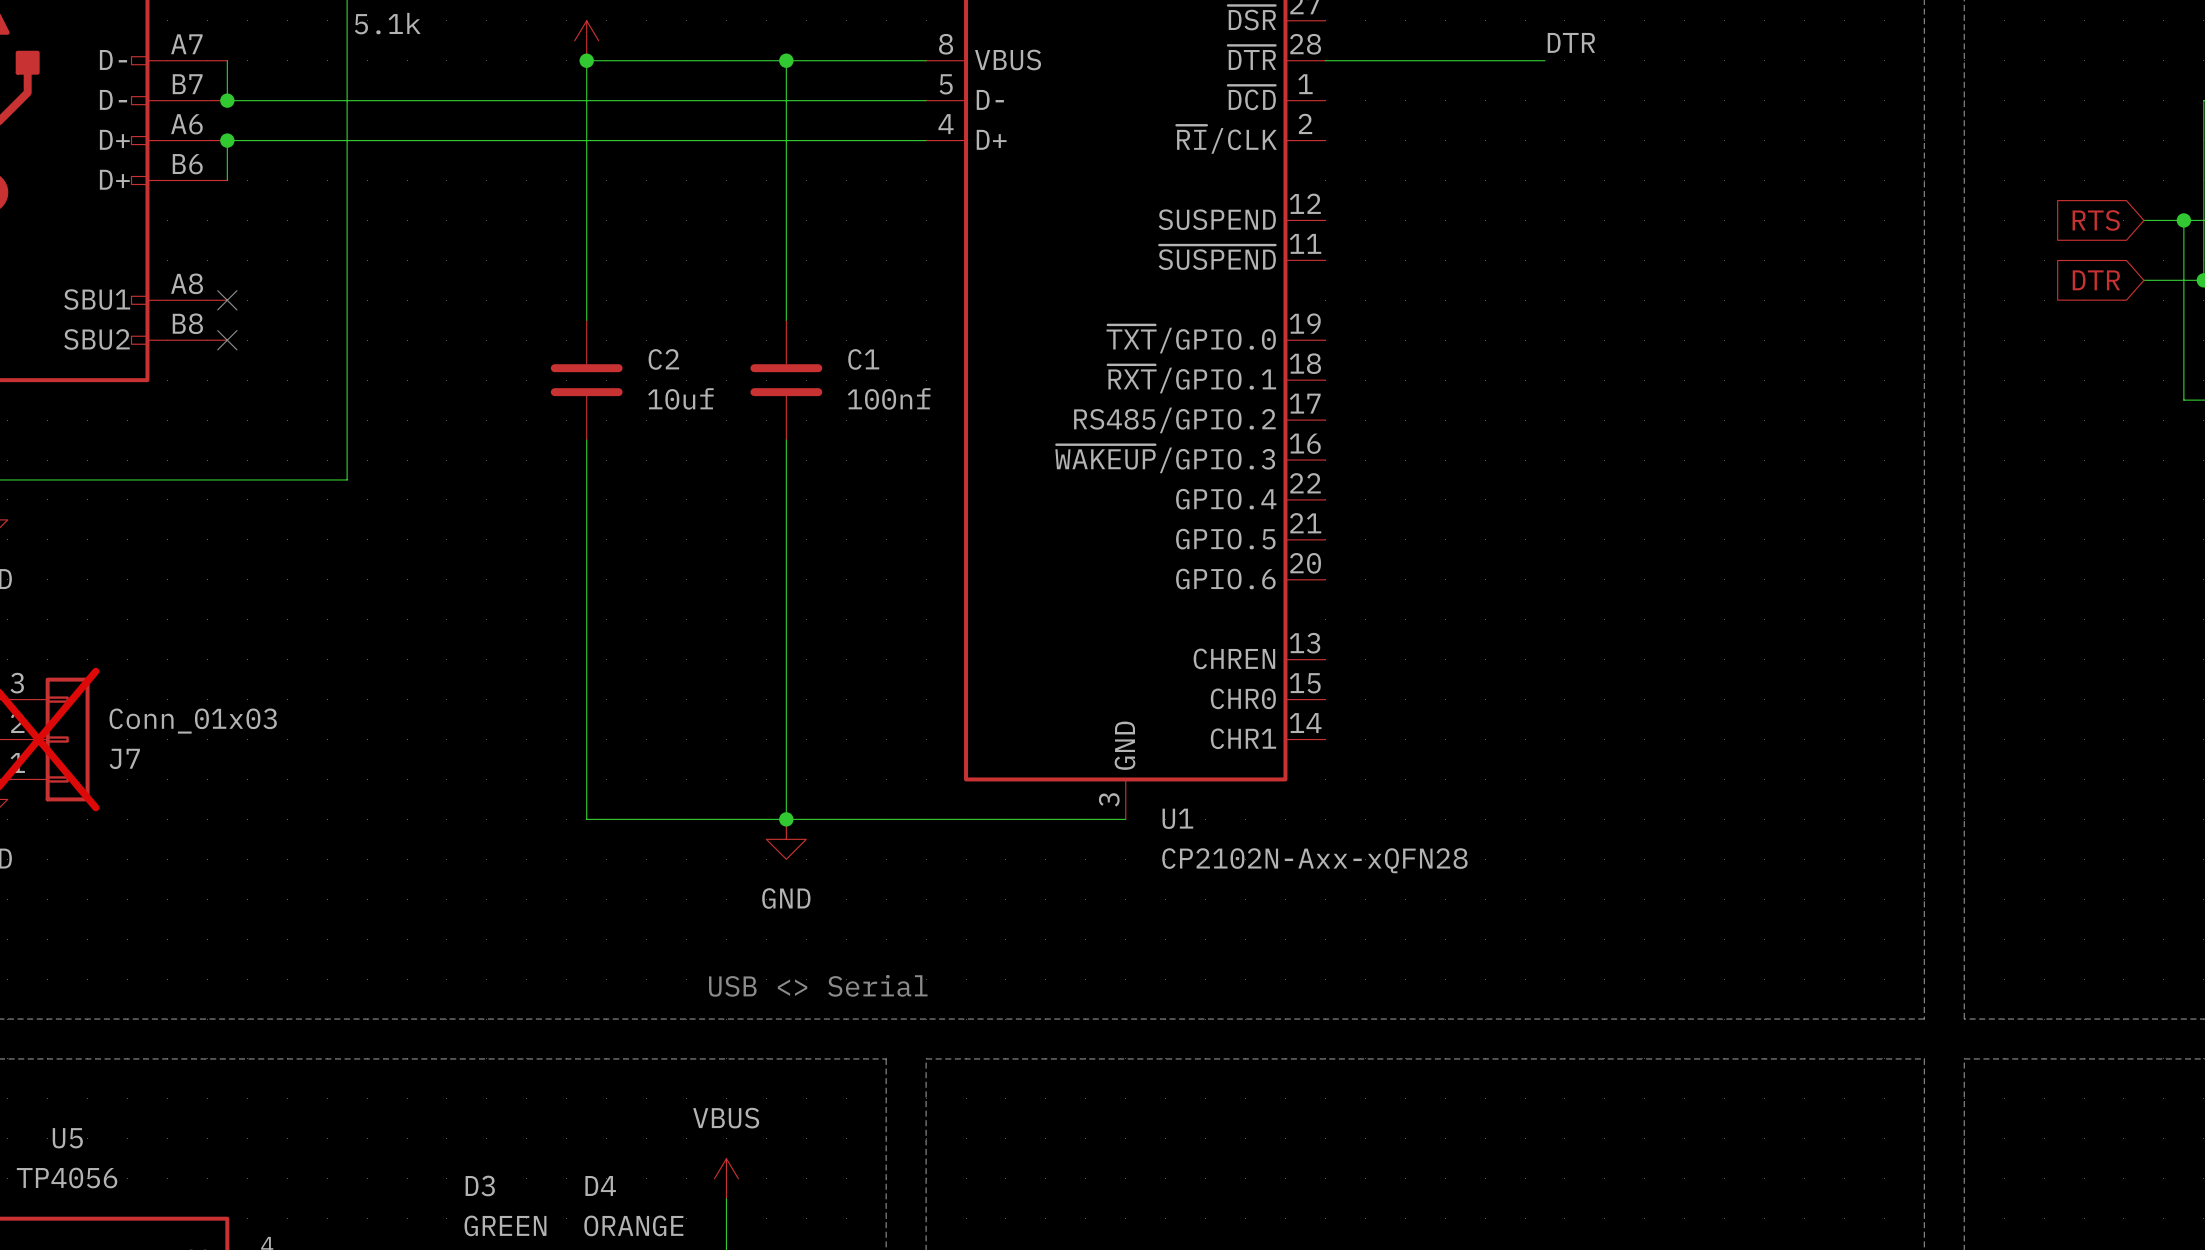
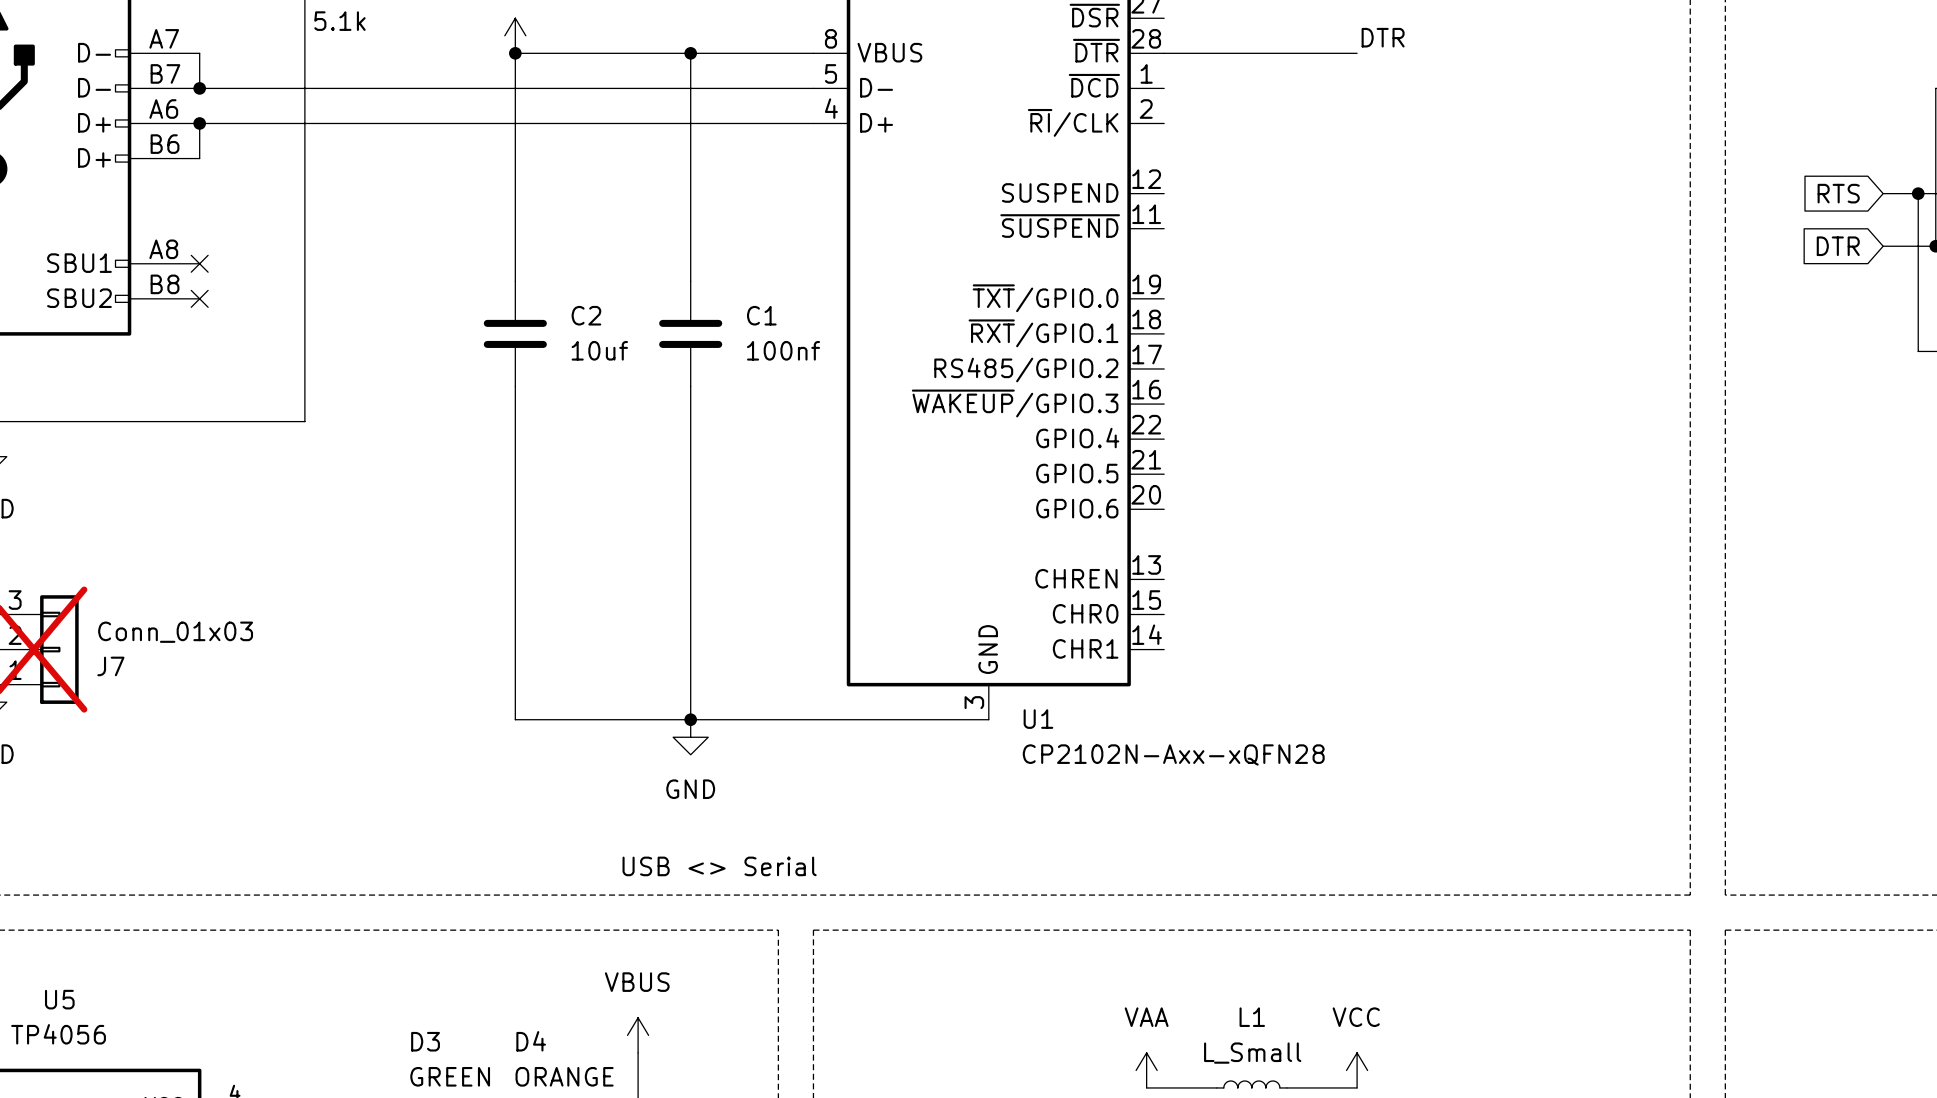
power symbol: none -> VAA (1146, 1070)
power symbol: none -> VCC (1357, 1070)
L1: none -> L_Small (1251, 1084)
wire: none -> (1146, 1087) (1216, 1087)
wire: none -> (1286, 1087) (1357, 1087)

